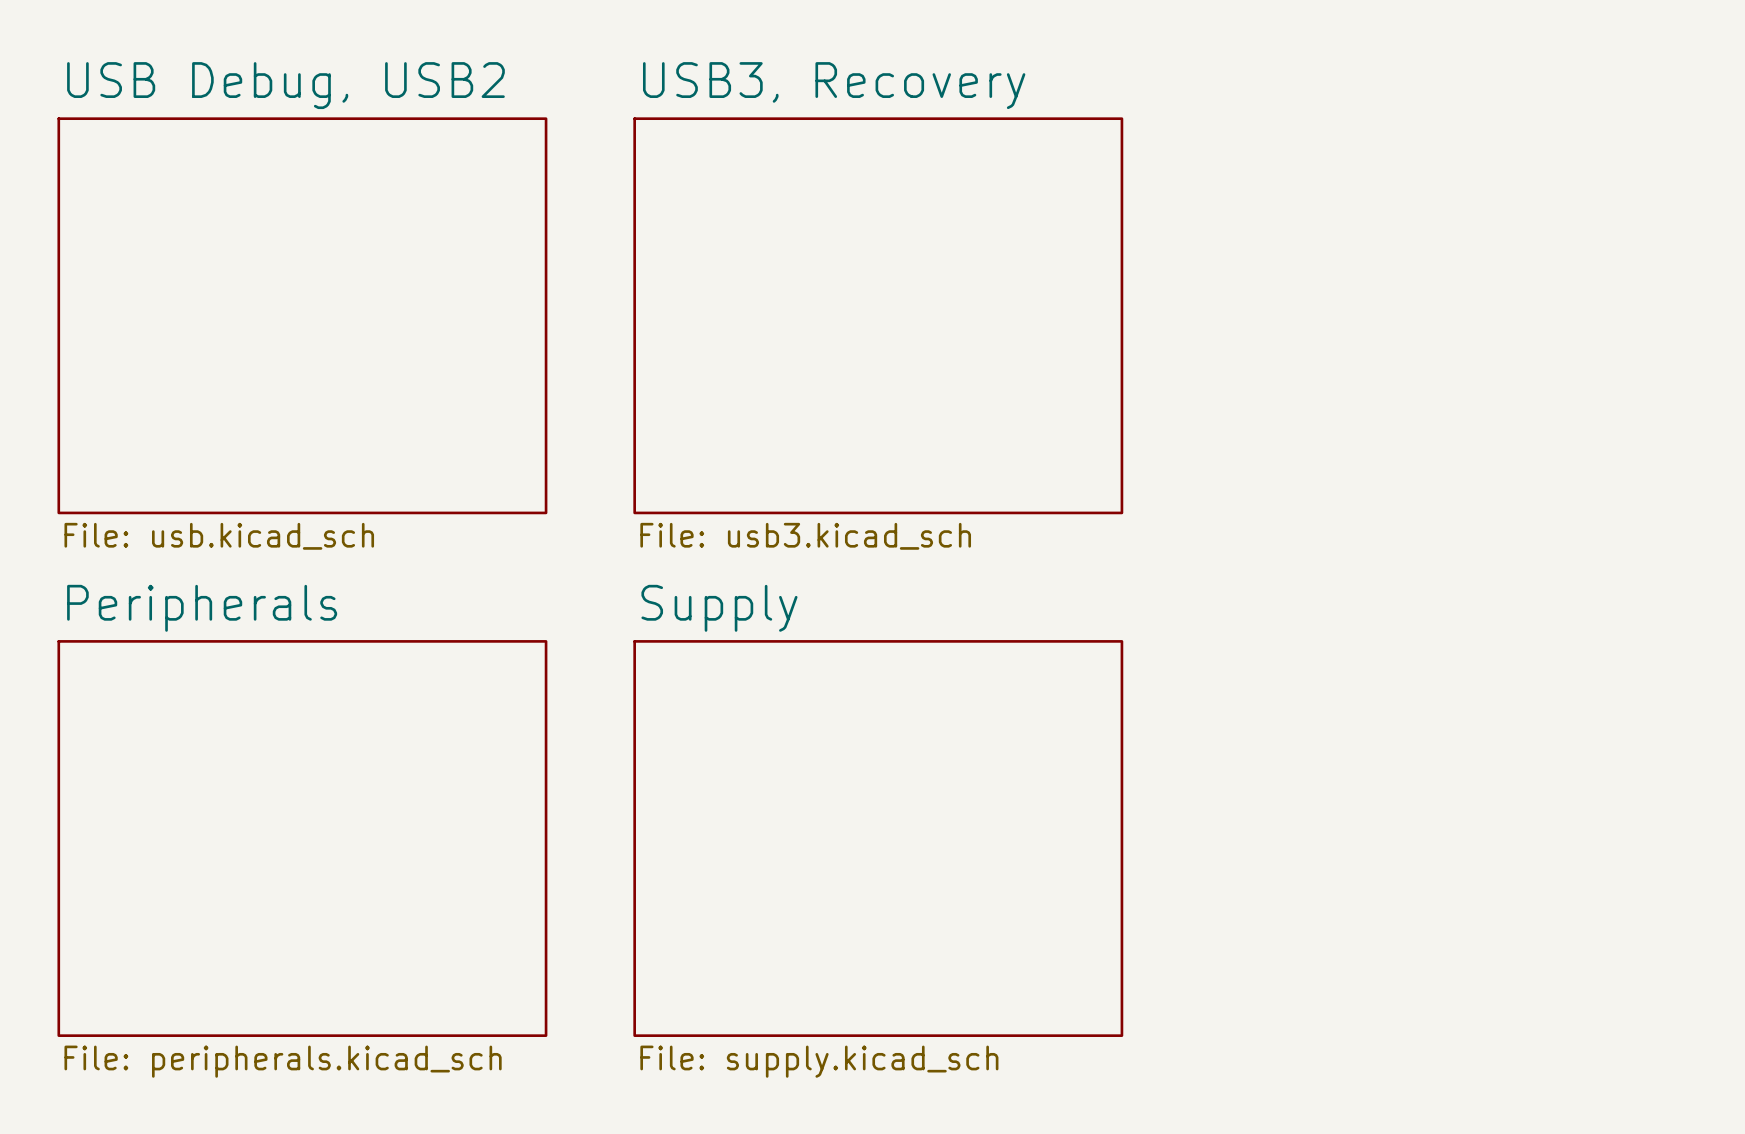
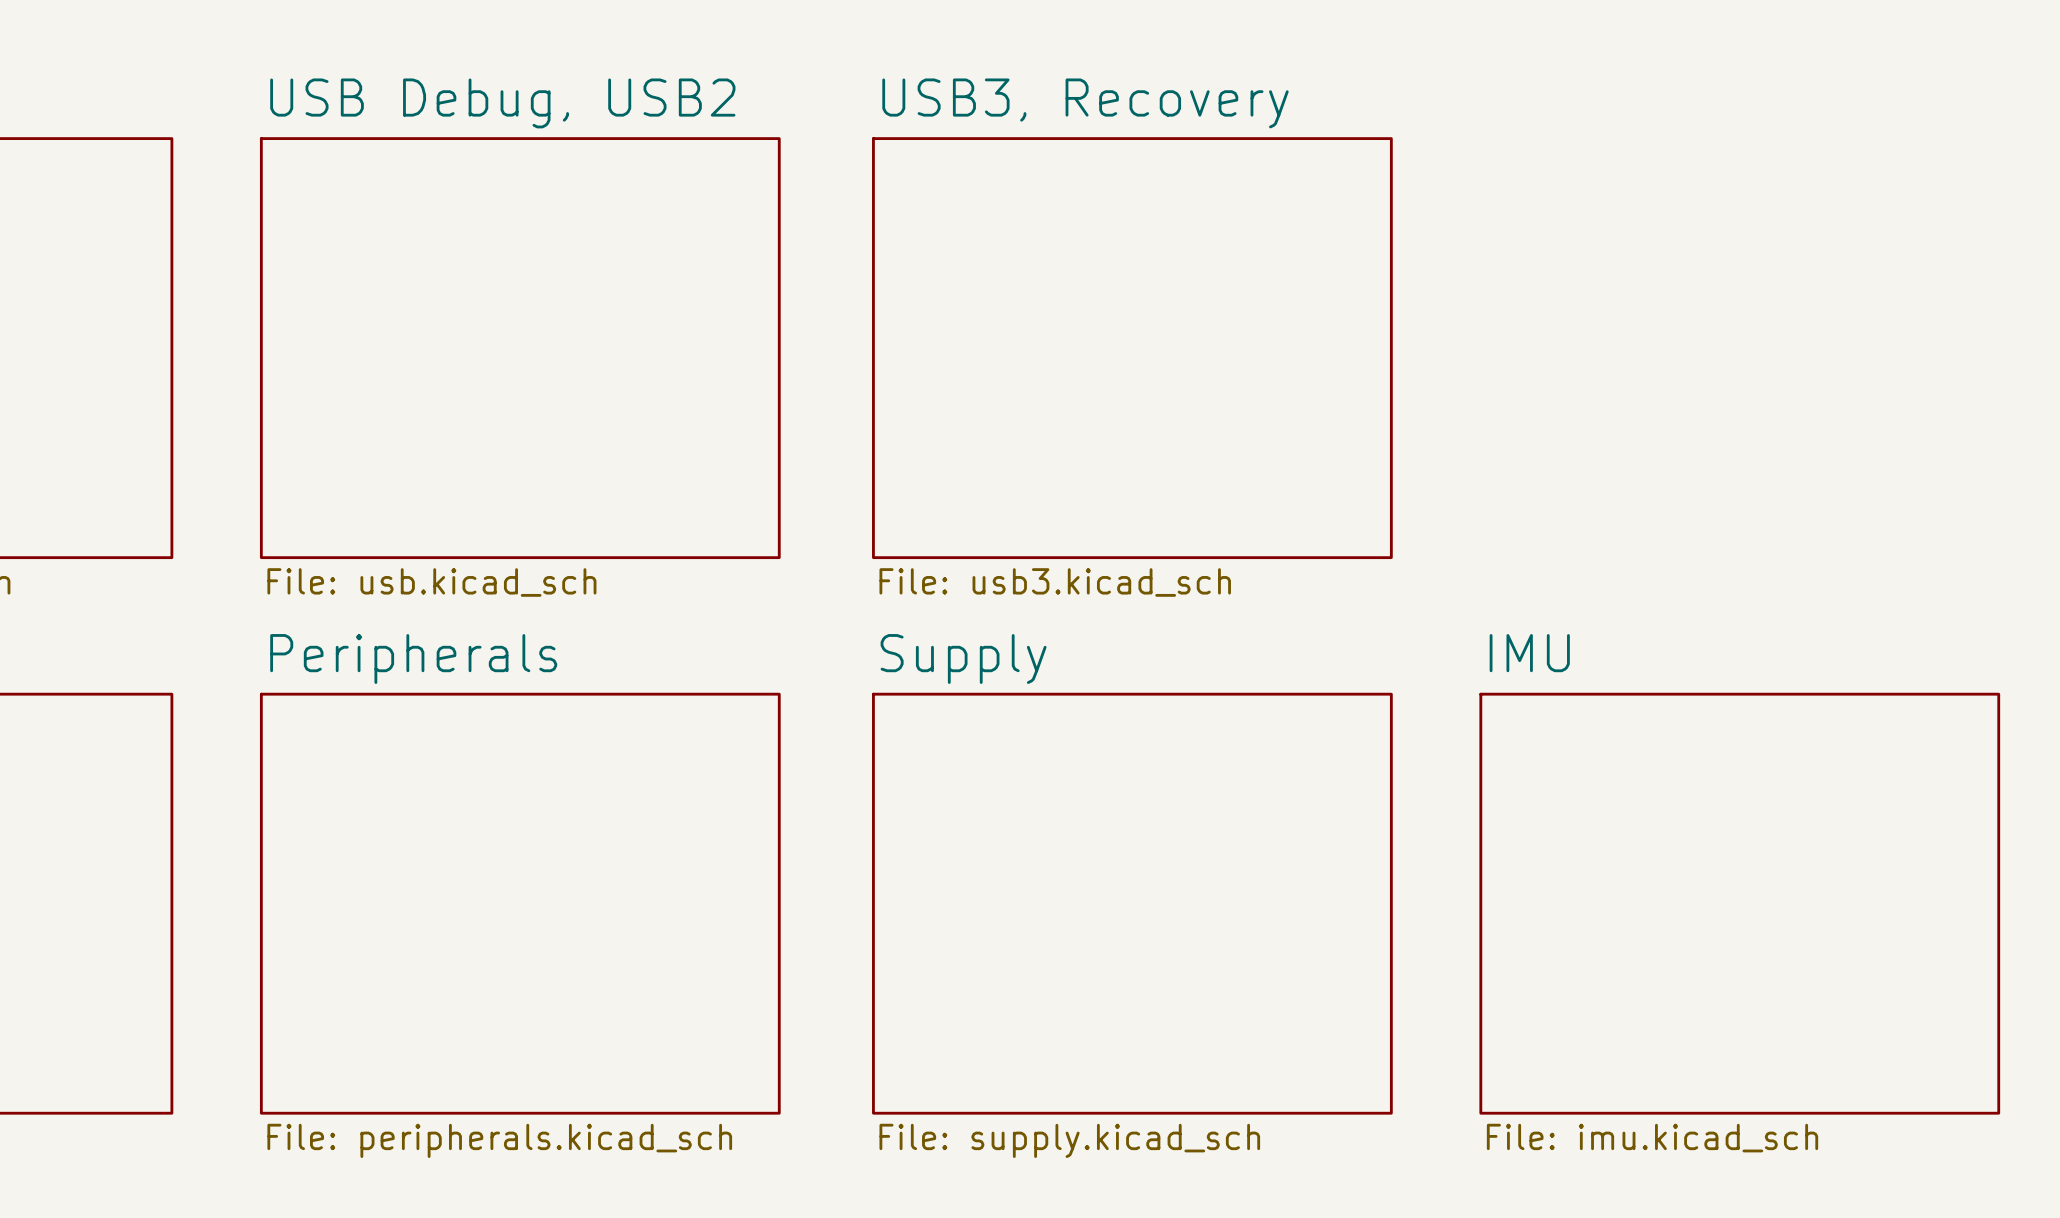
sheet IMU: none -> File: imu.kicad_sch (1739, 903)

